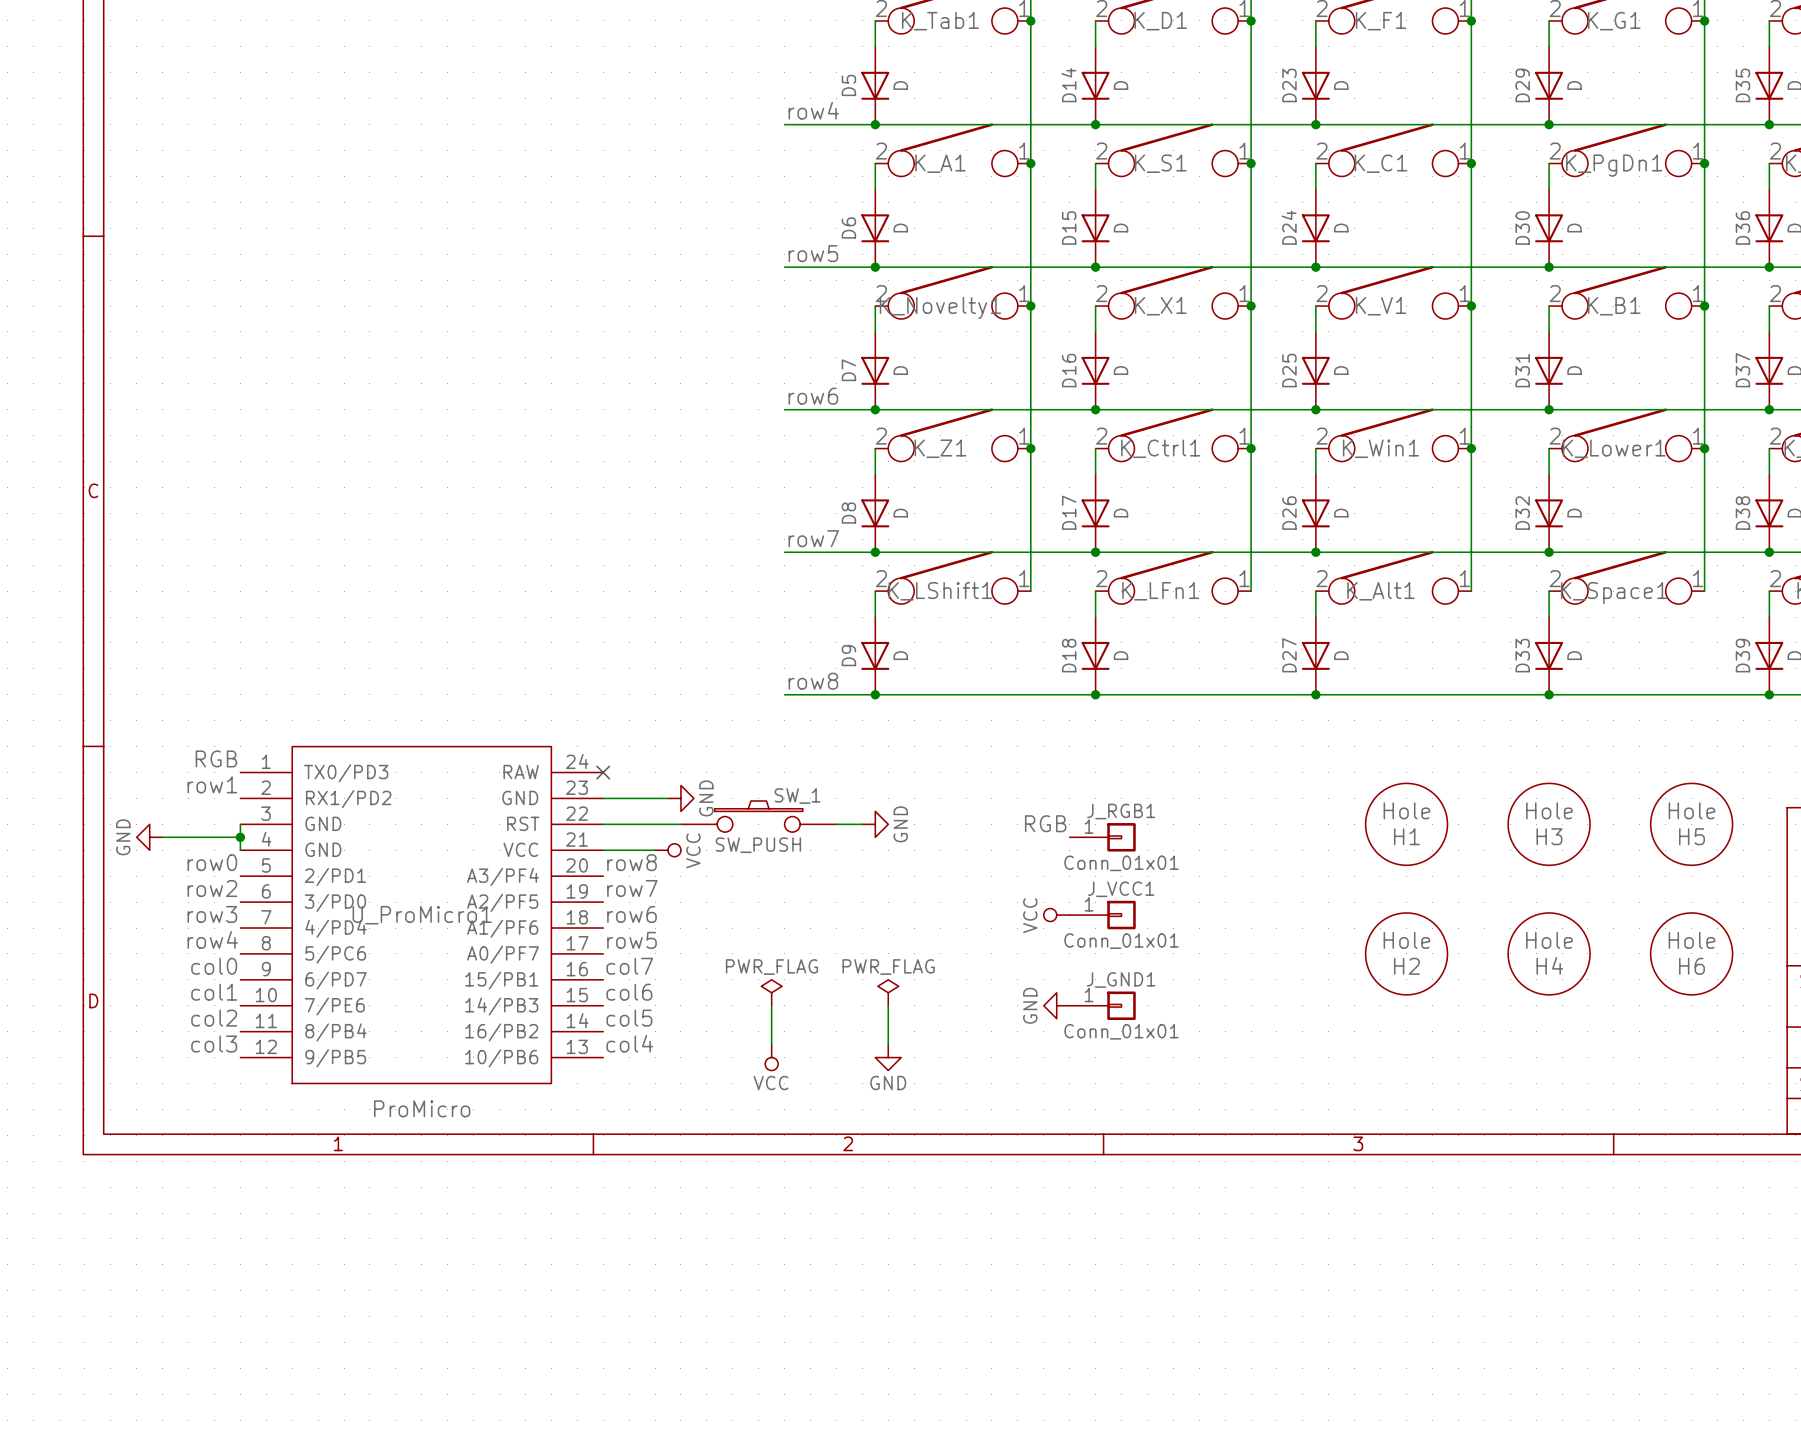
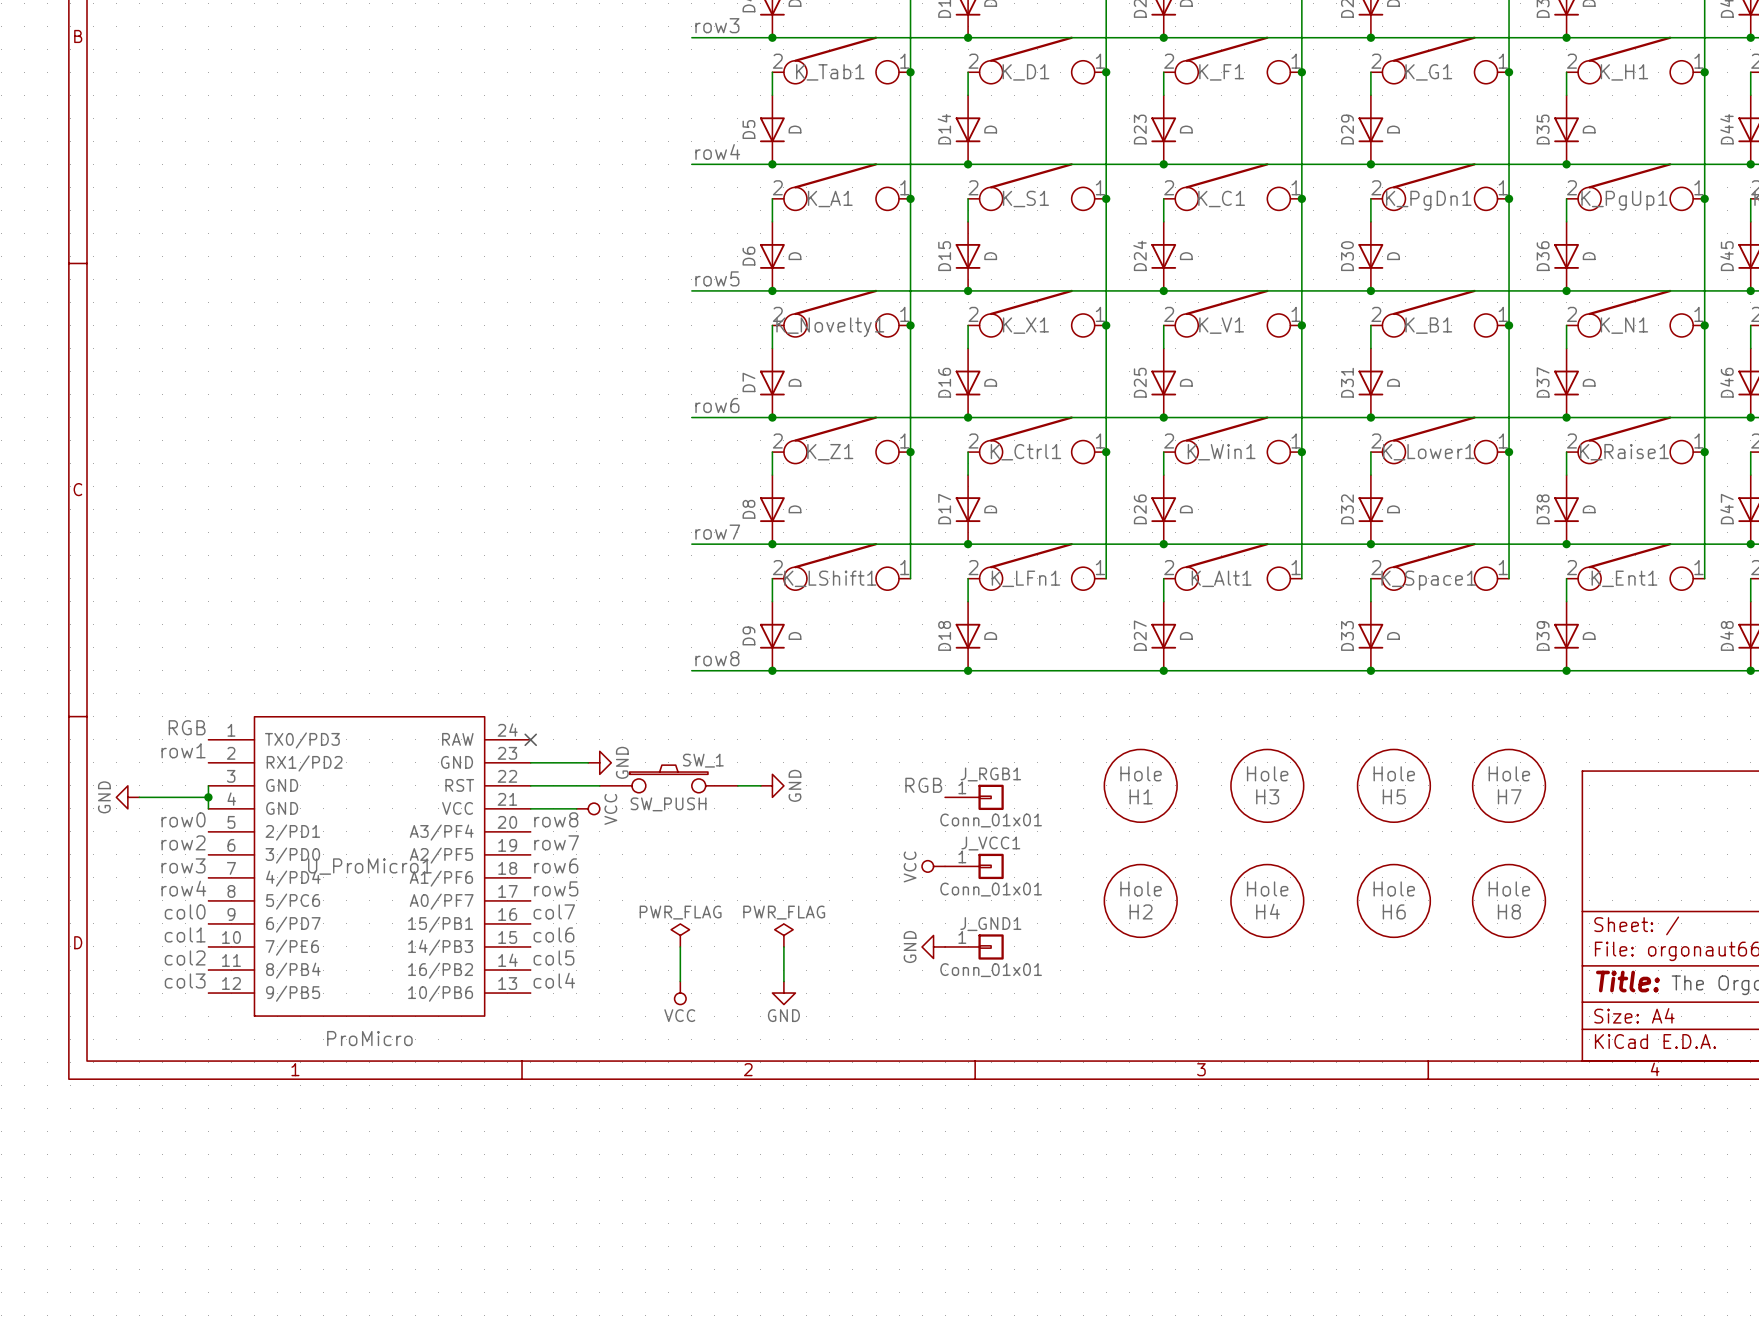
H1 position: (1406, 824) -> (1140, 785)
H3 position: (1549, 824) -> (1267, 785)
H5 position: (1691, 824) -> (1393, 785)
H7: none -> Hole (1509, 785)
H2 position: (1406, 953) -> (1140, 900)
H4 position: (1549, 953) -> (1267, 900)
H6 position: (1691, 953) -> (1393, 900)
H8: none -> Hole (1509, 900)

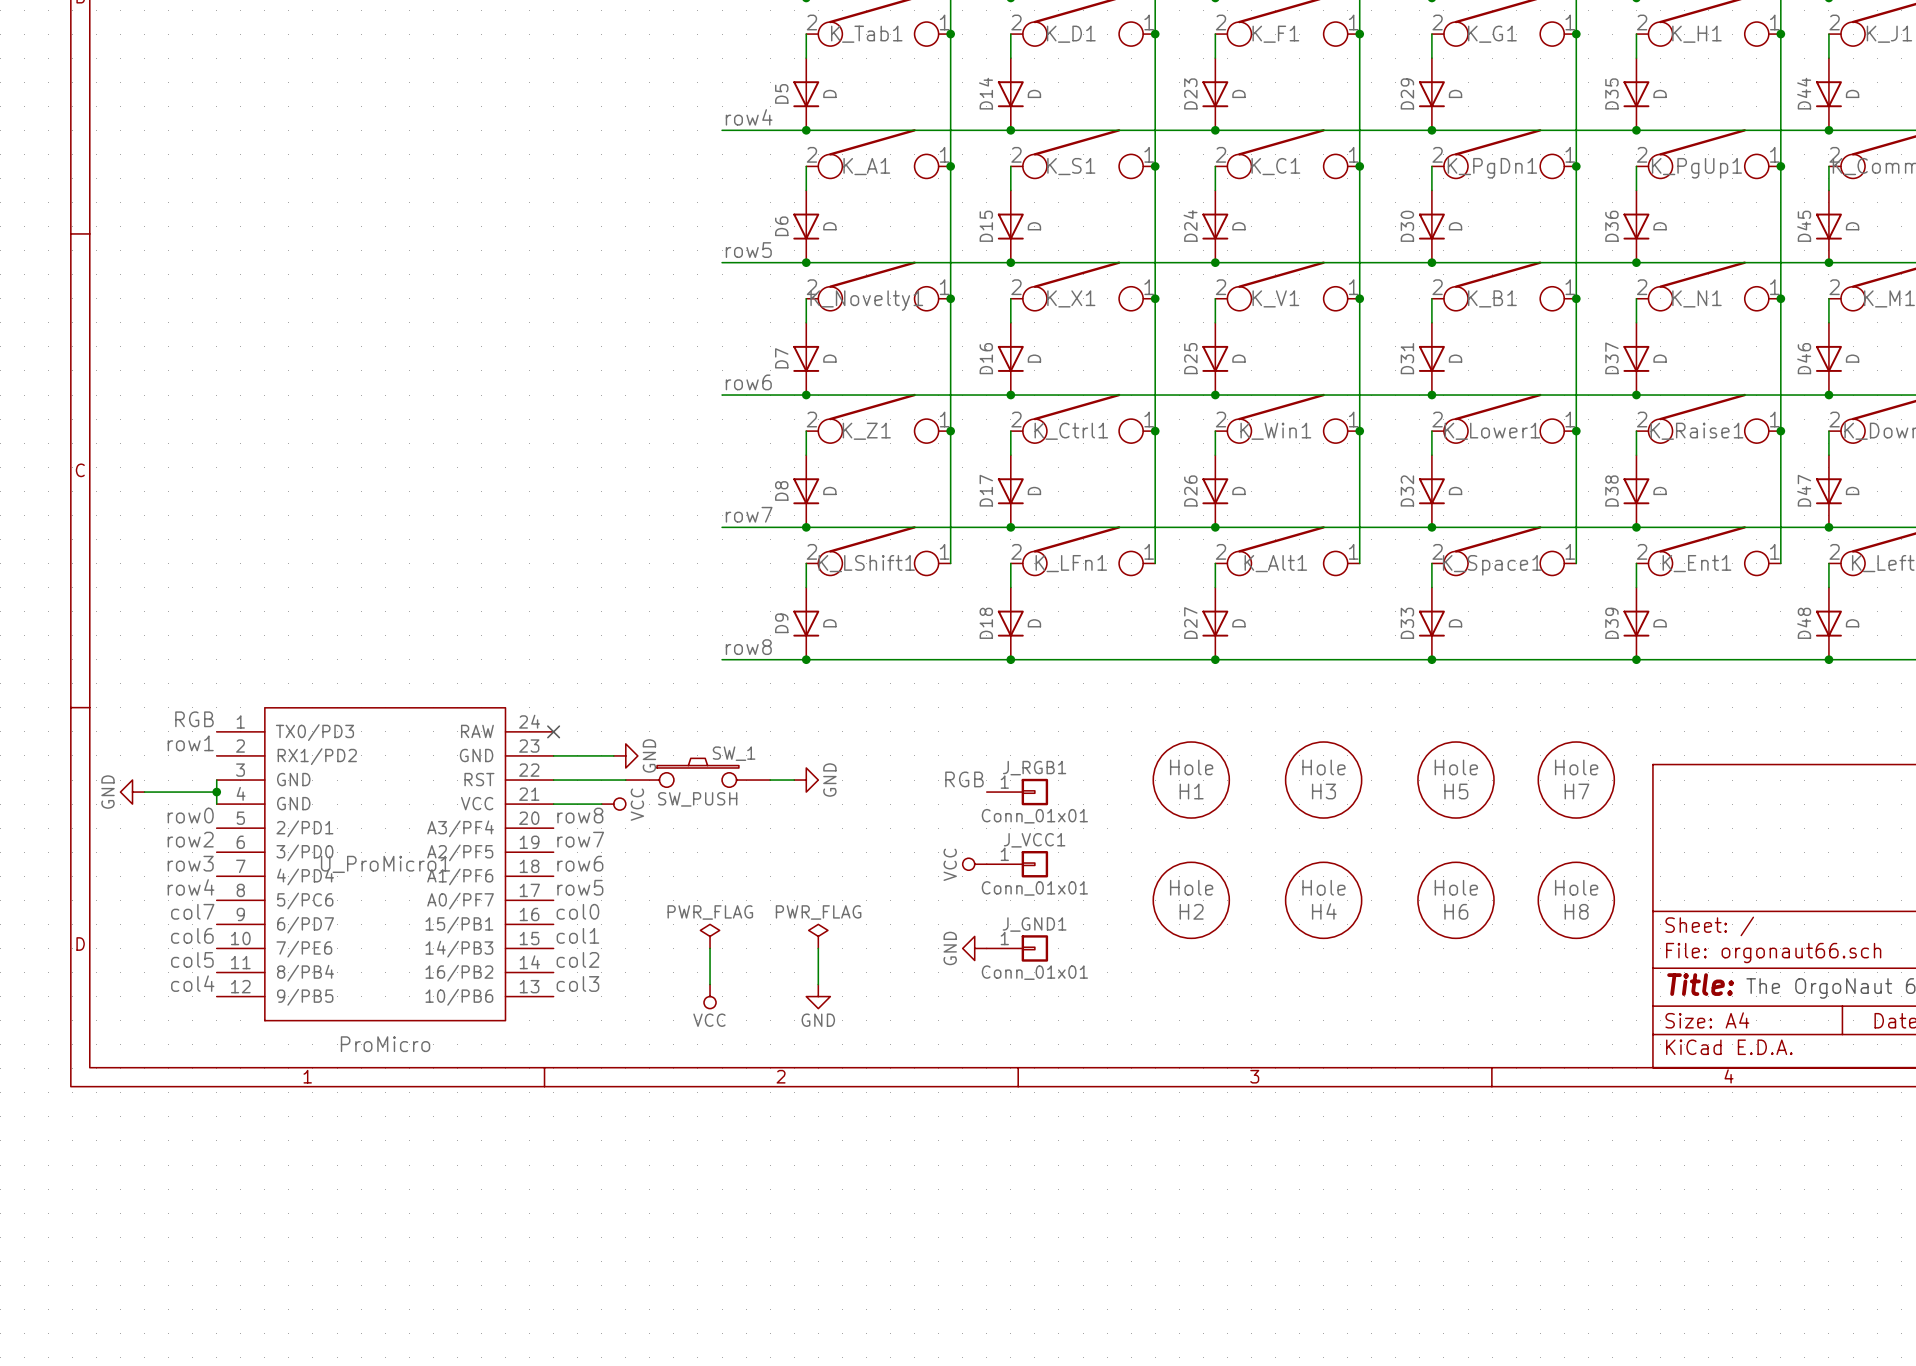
label: col0 (185, 911) -> col7 (192, 911)
label: col7 (554, 911) -> col0 (577, 911)
label: col1 (185, 934) -> col6 (192, 935)
label: col6 (553, 934) -> col1 (577, 935)
label: col2 (185, 957) -> col5 (192, 959)
label: col5 (553, 957) -> col2 (577, 959)
label: col3 (185, 980) -> col4 (192, 983)
label: col4 (554, 980) -> col3 (577, 983)

